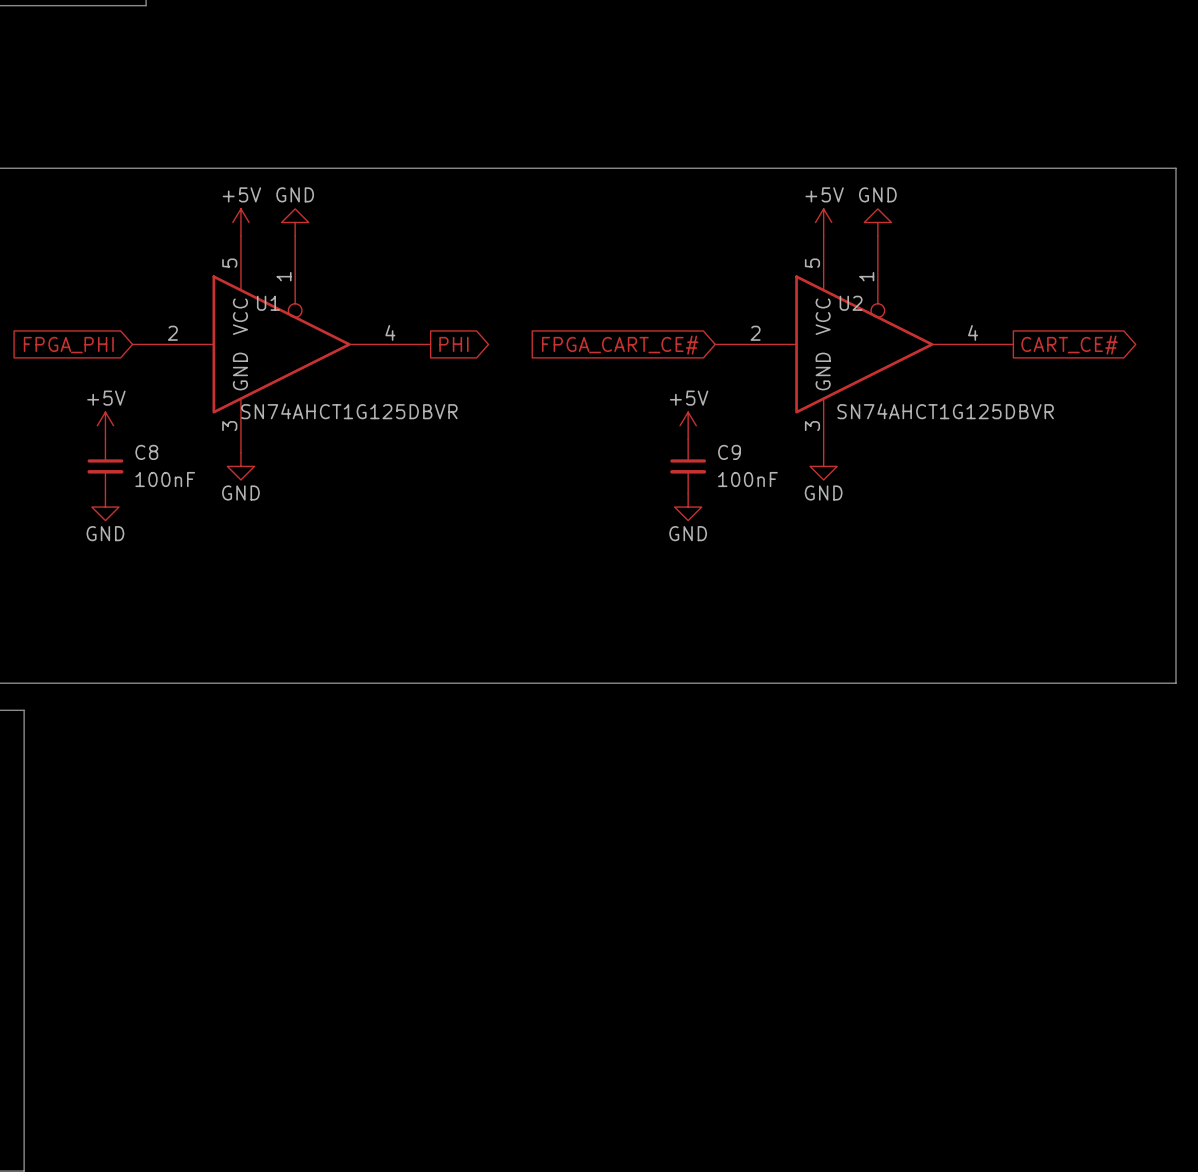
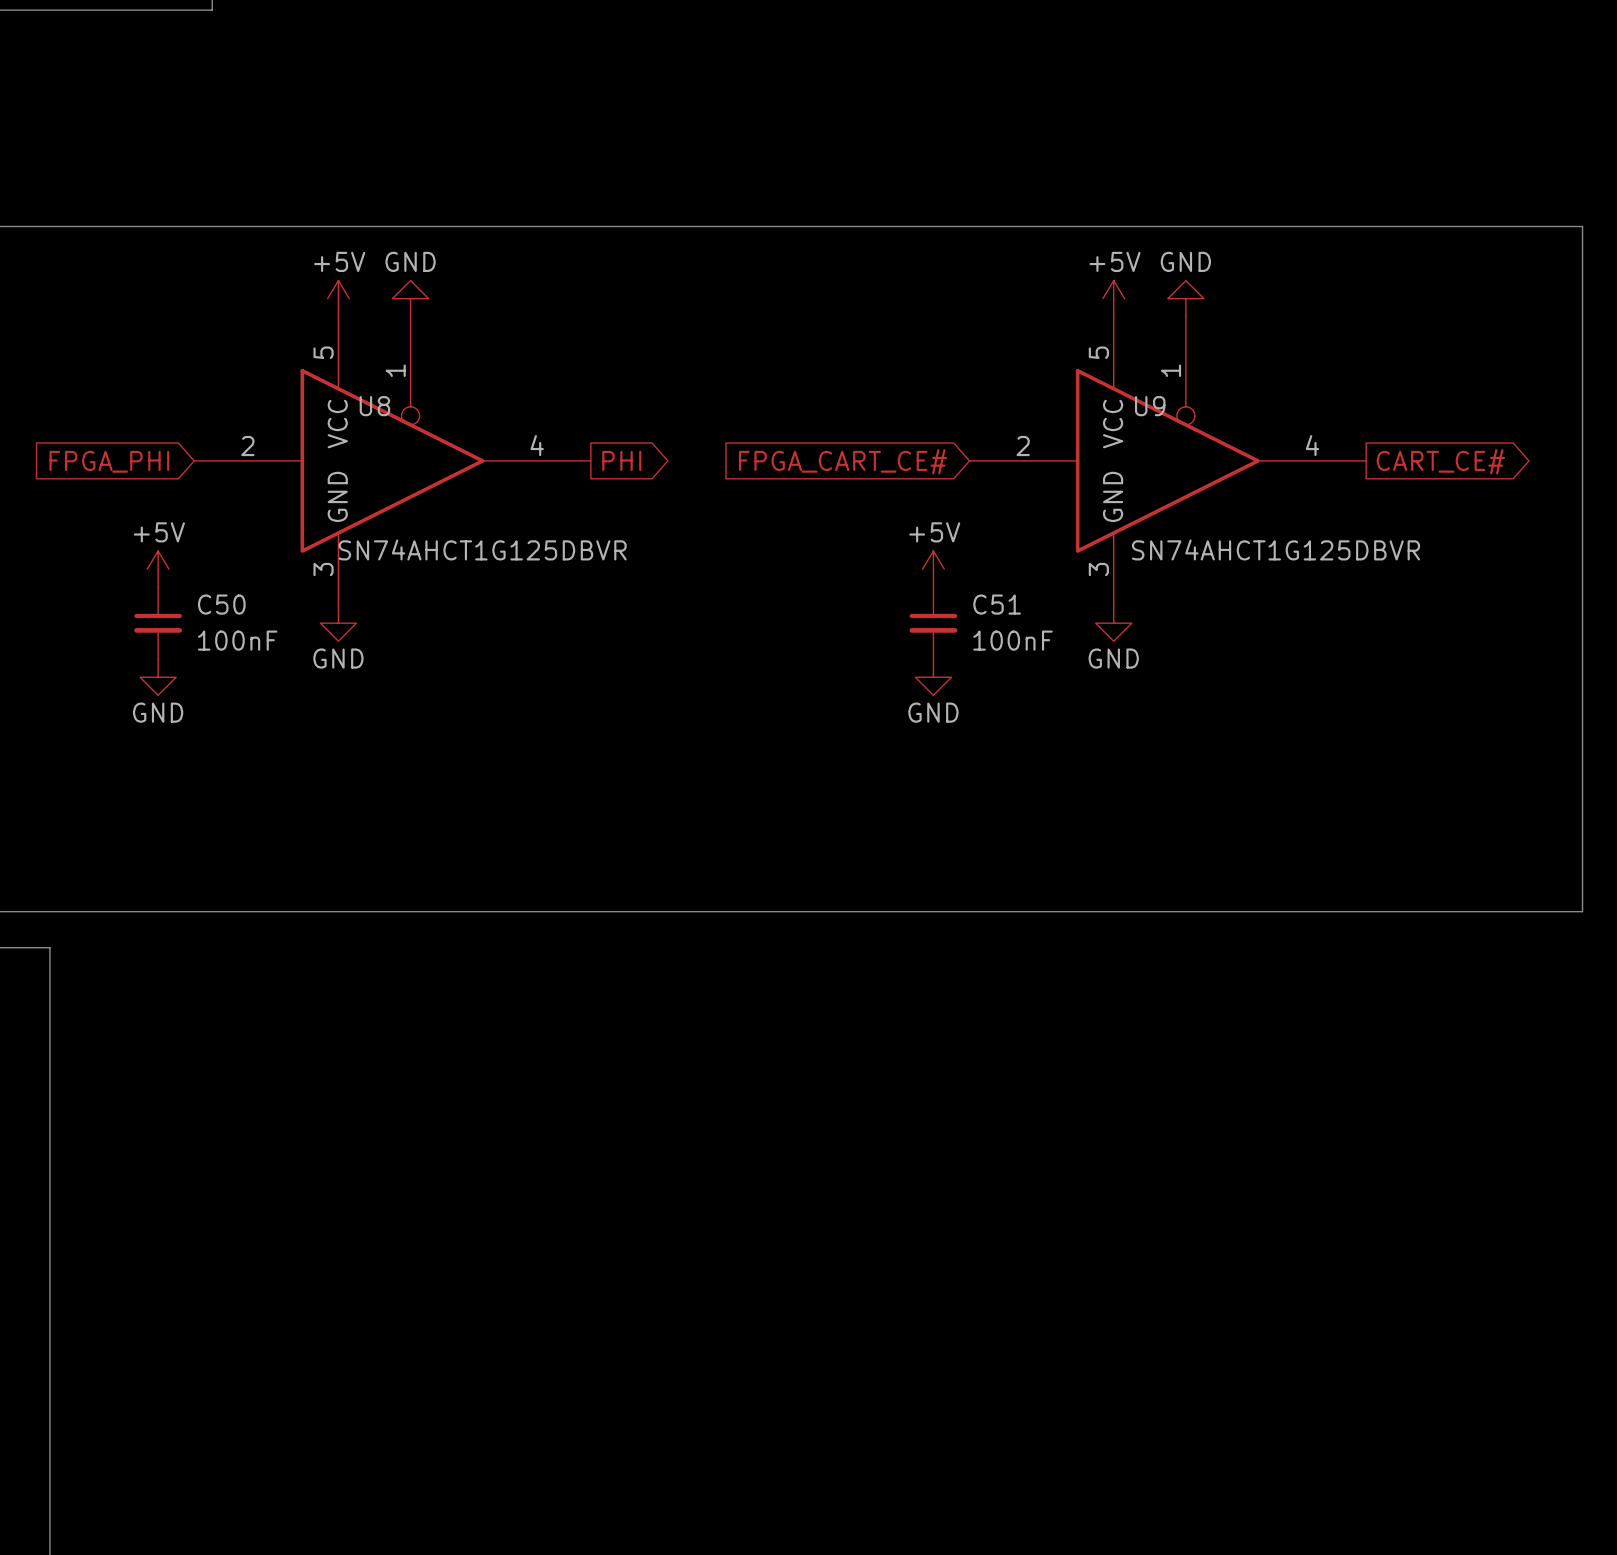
U1 name: U1 (268, 303) -> U8 (374, 406)
U2 name: U2 (851, 303) -> U9 (1150, 406)
C8 name: C8 (146, 452) -> C50 (221, 604)
C9 name: C9 (729, 452) -> C51 (997, 604)

